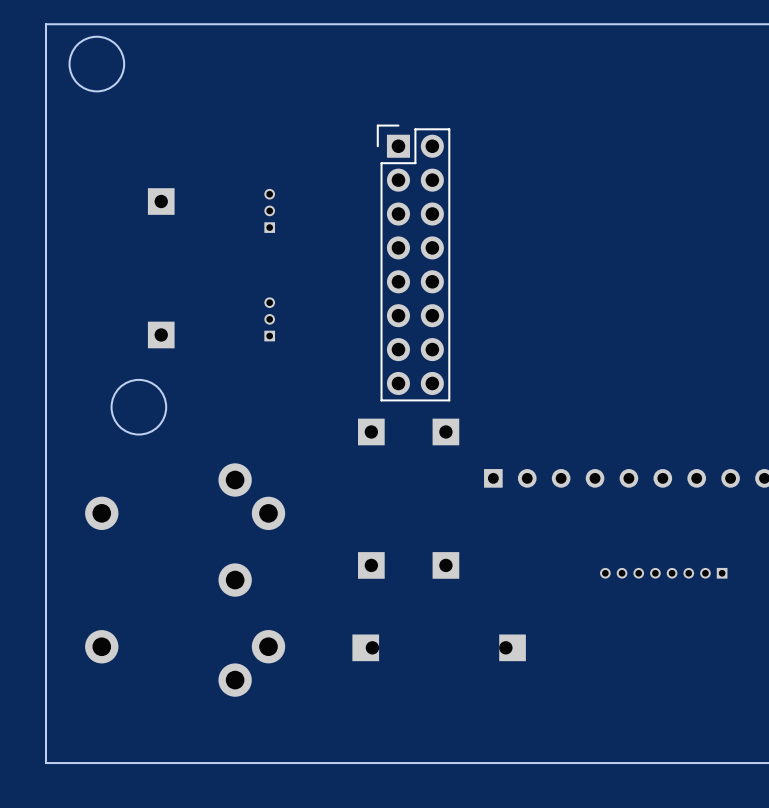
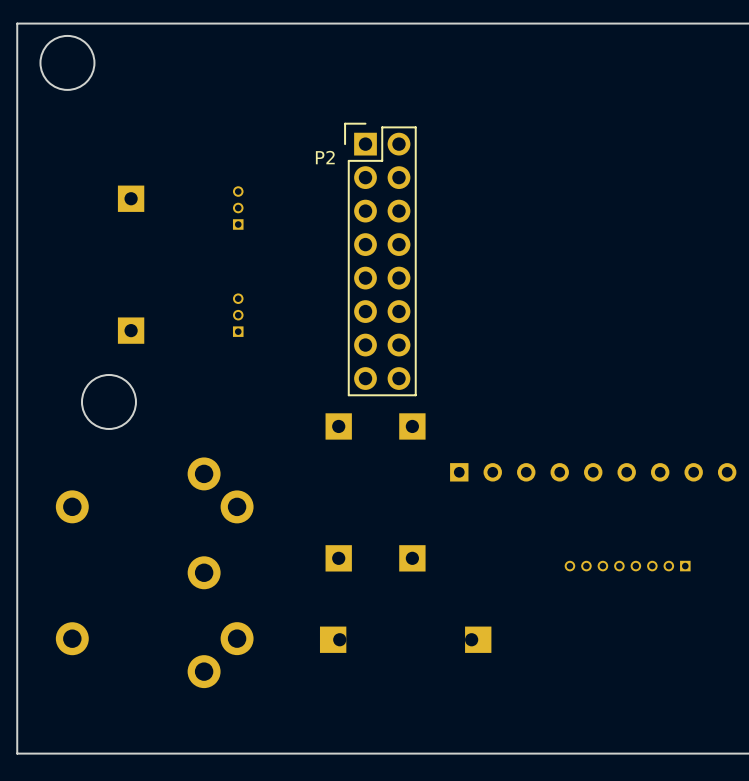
P2 name: none -> P2 (325, 157)

